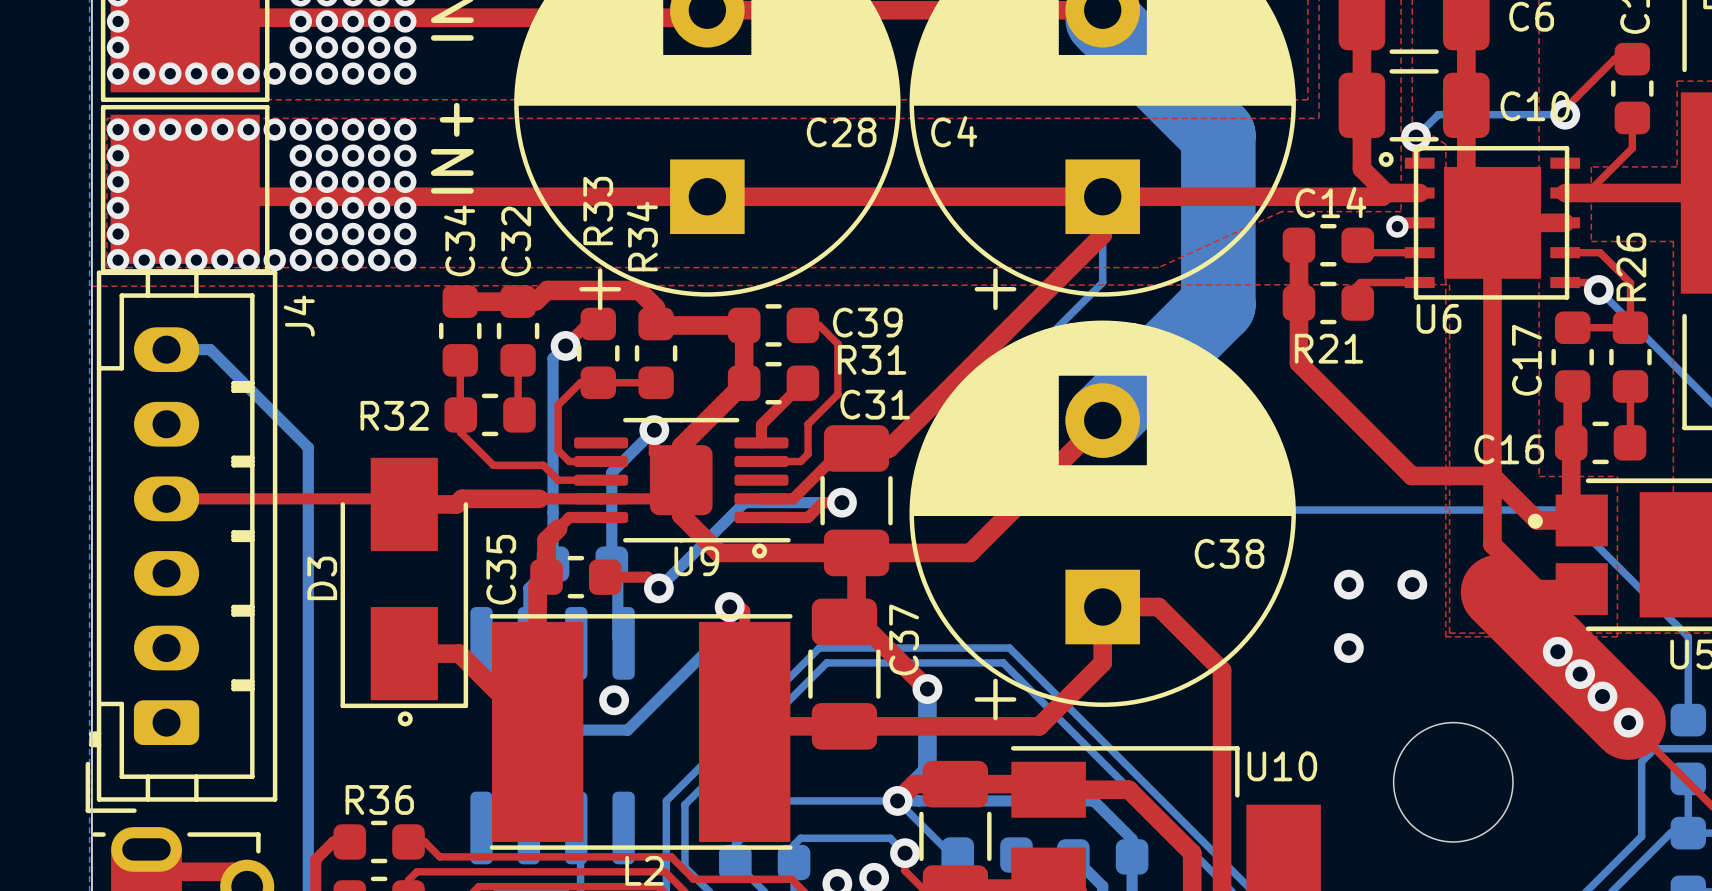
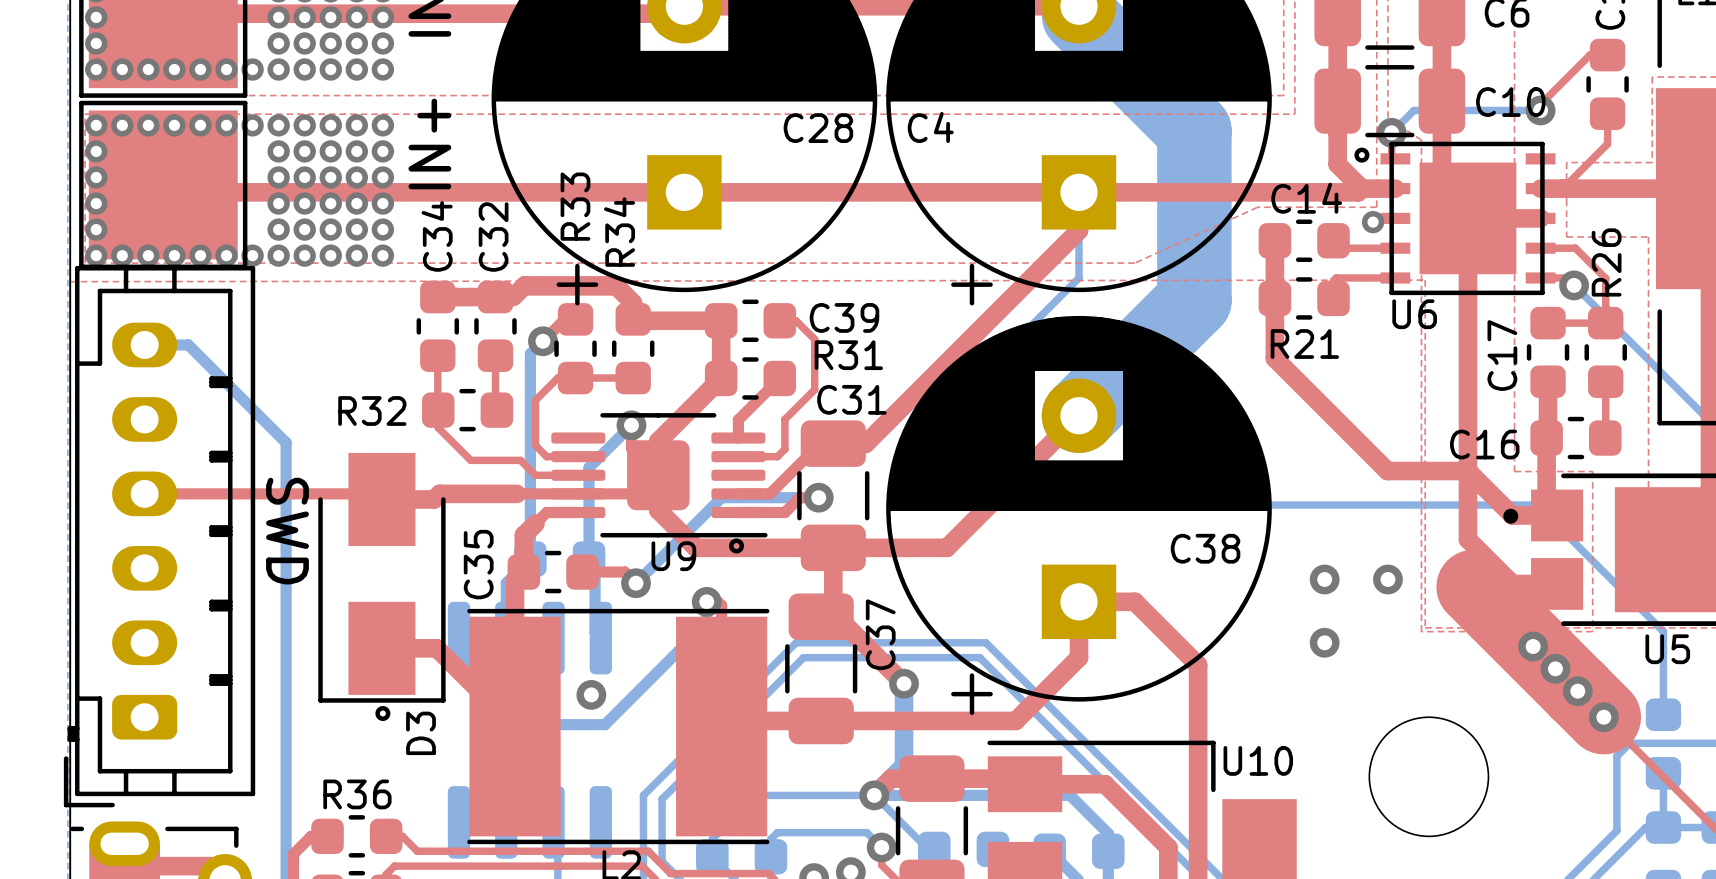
J4 name: J4 (299, 316) -> none
text: none -> SWD (287, 531)
D3 name position: D3 (322, 578) -> D3 (421, 733)

